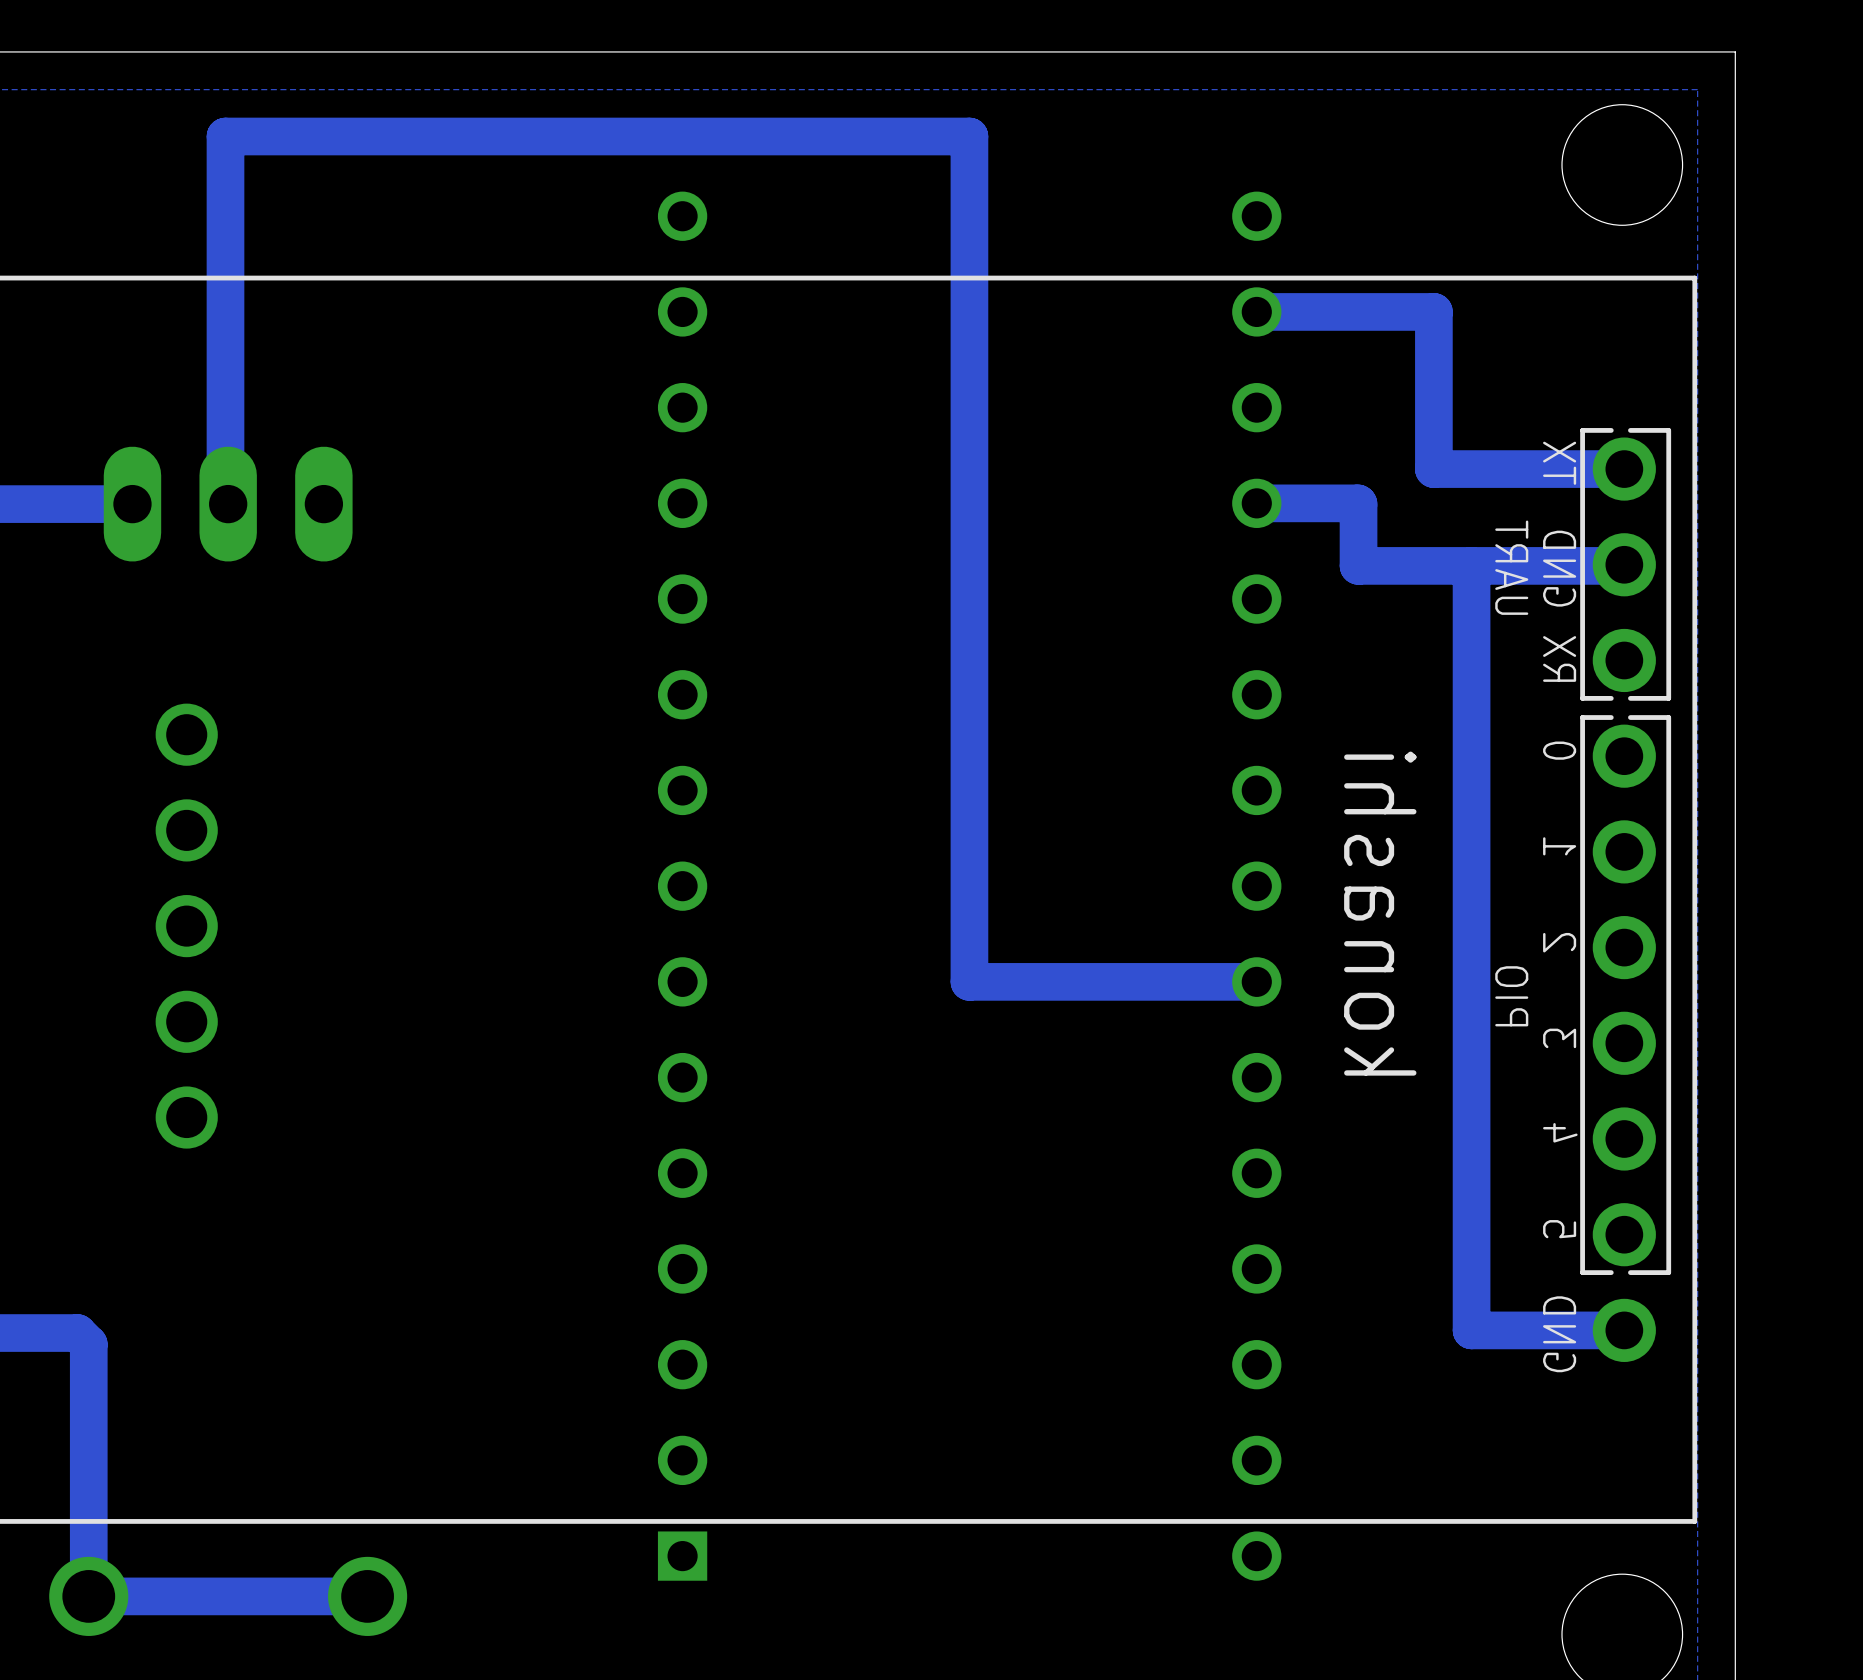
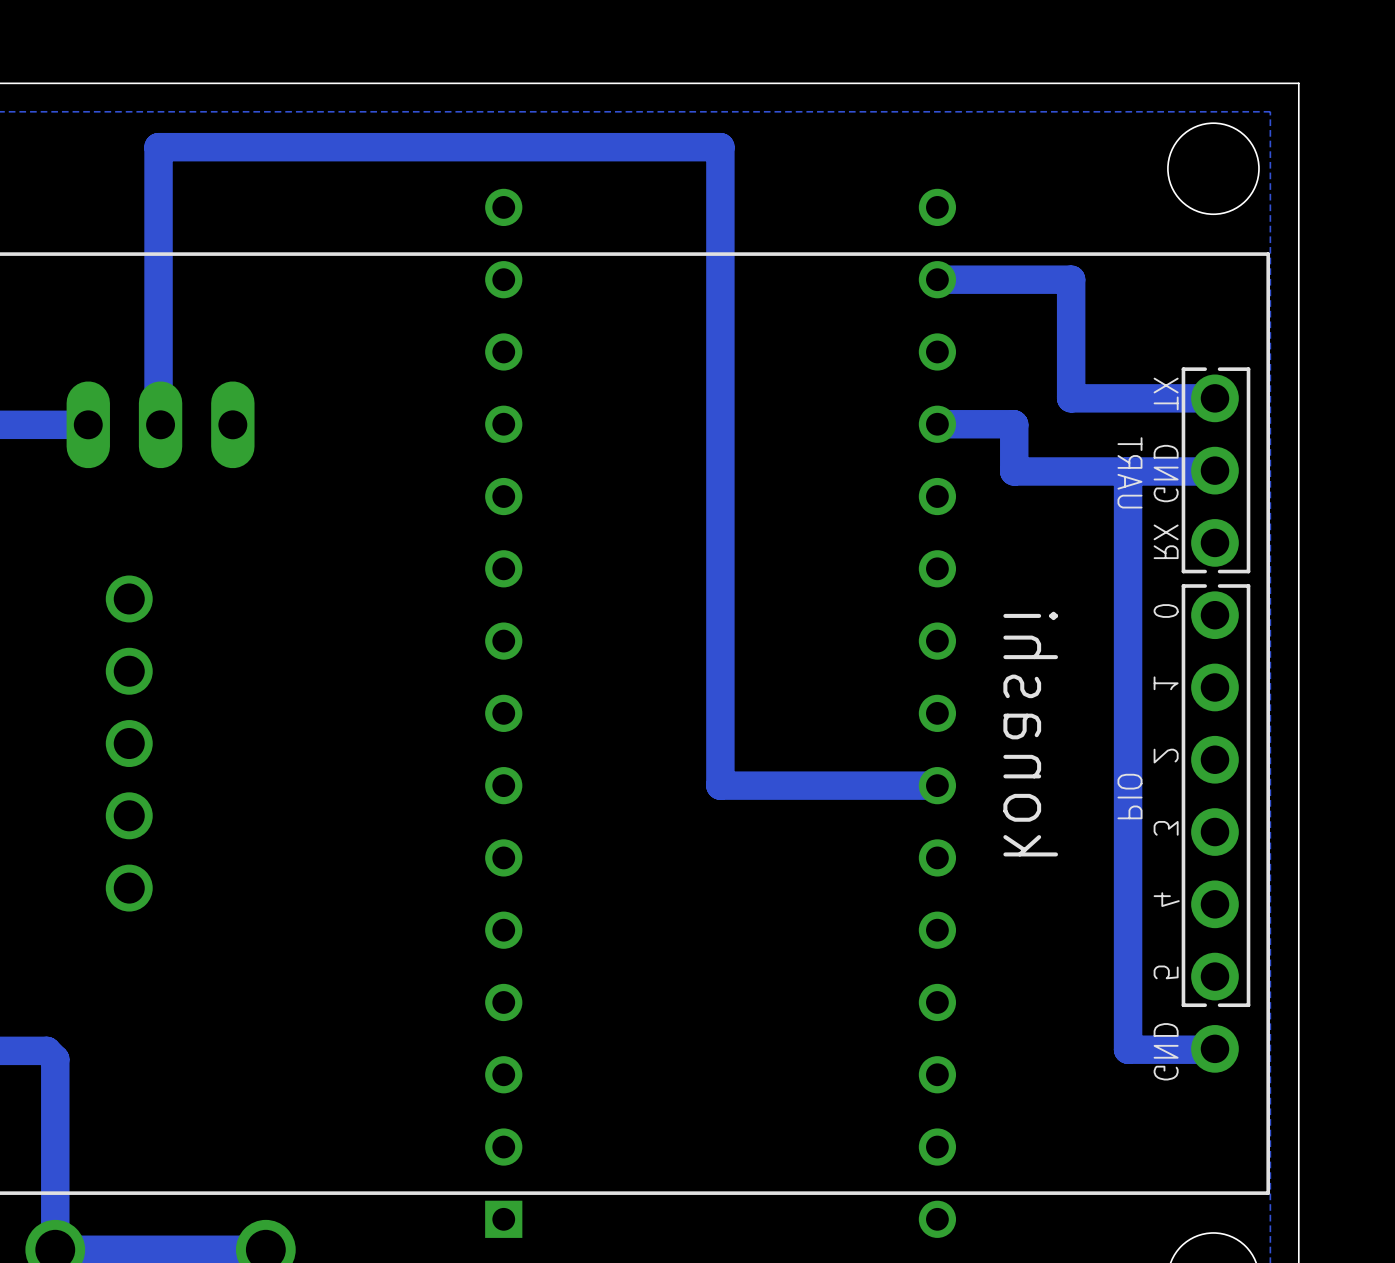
track: (1471, 565) (1471, 1330) (1624, 1330) -> none
track: none -> (1128, 471) (1128, 1049) (1217, 1049)

